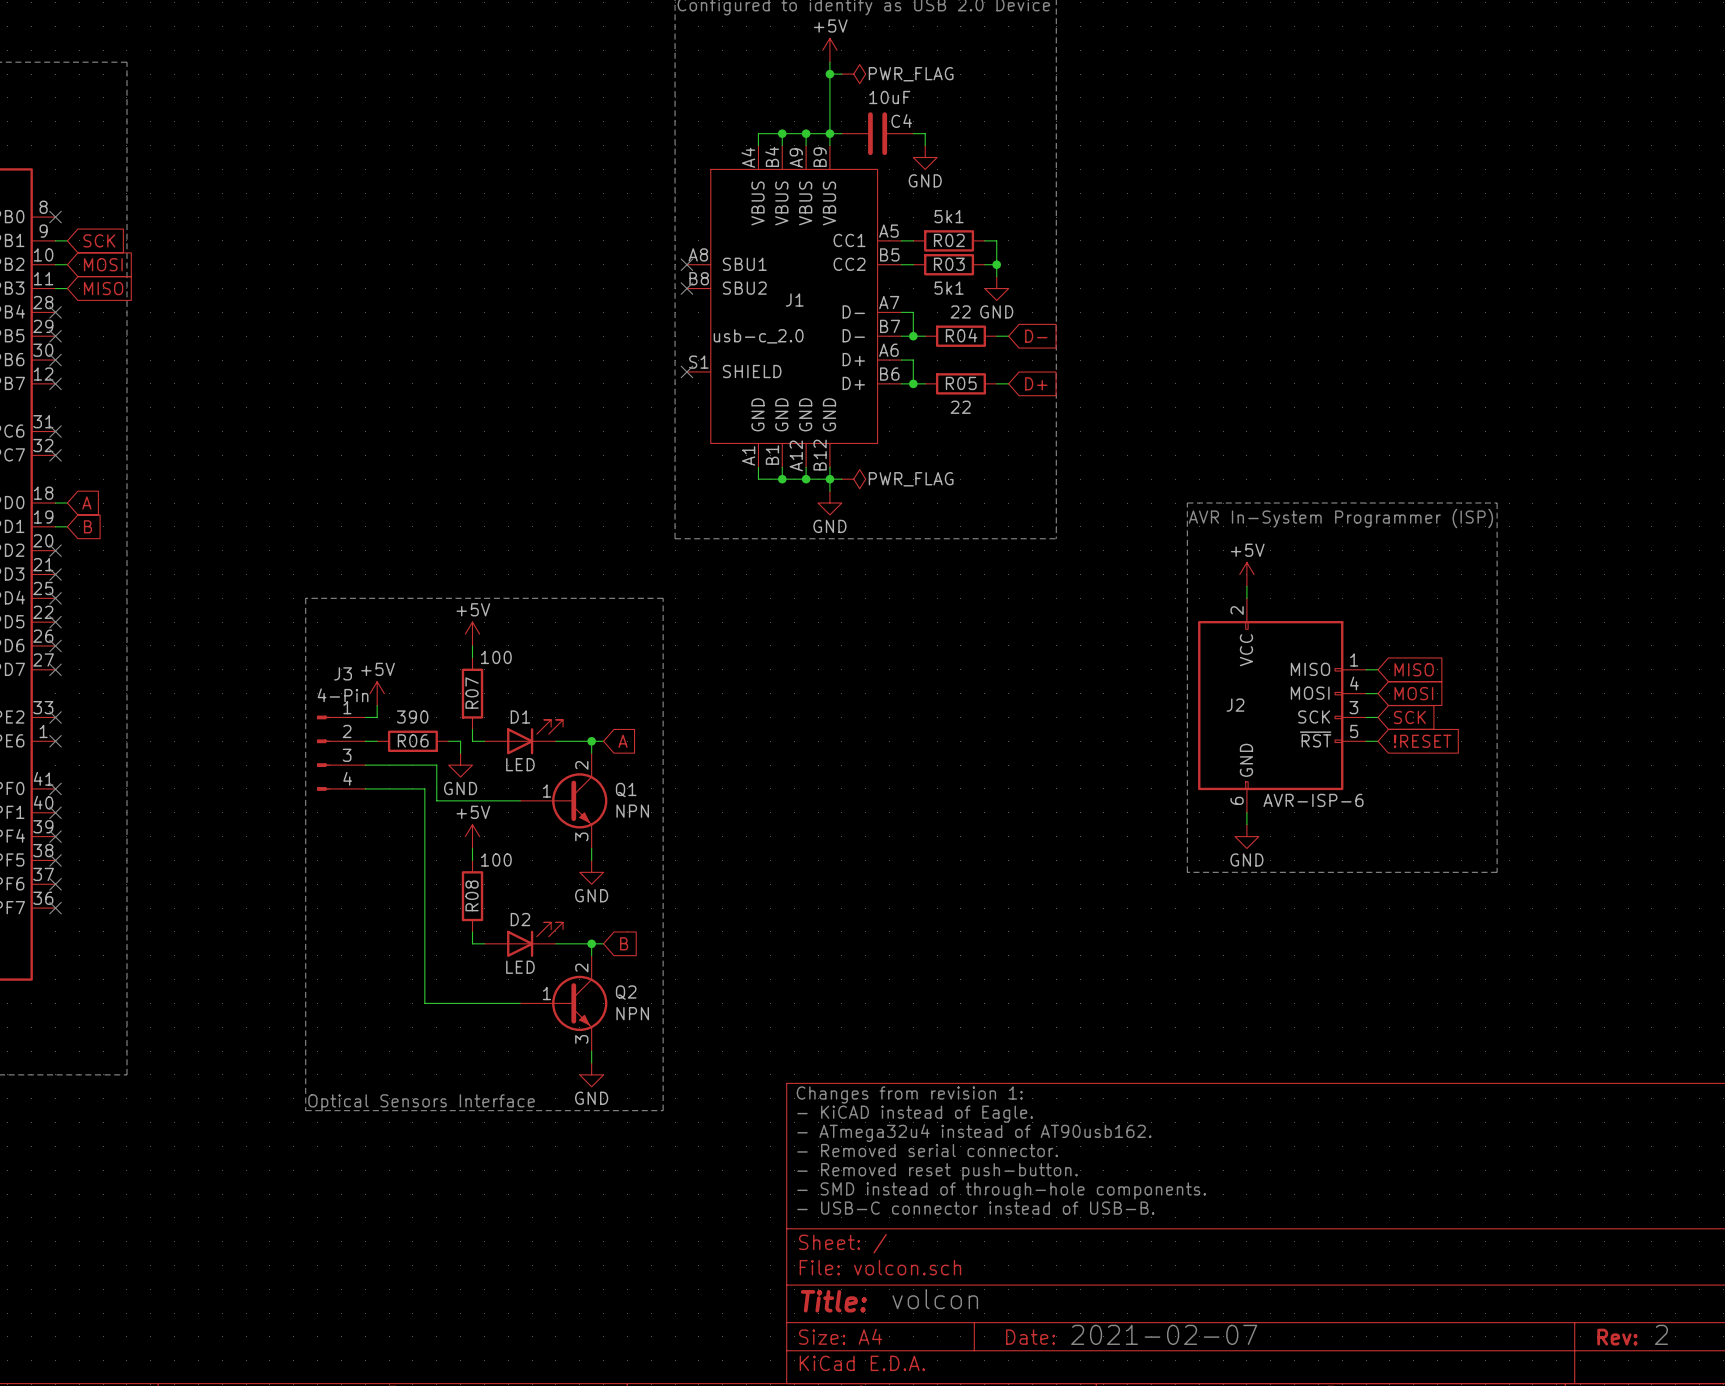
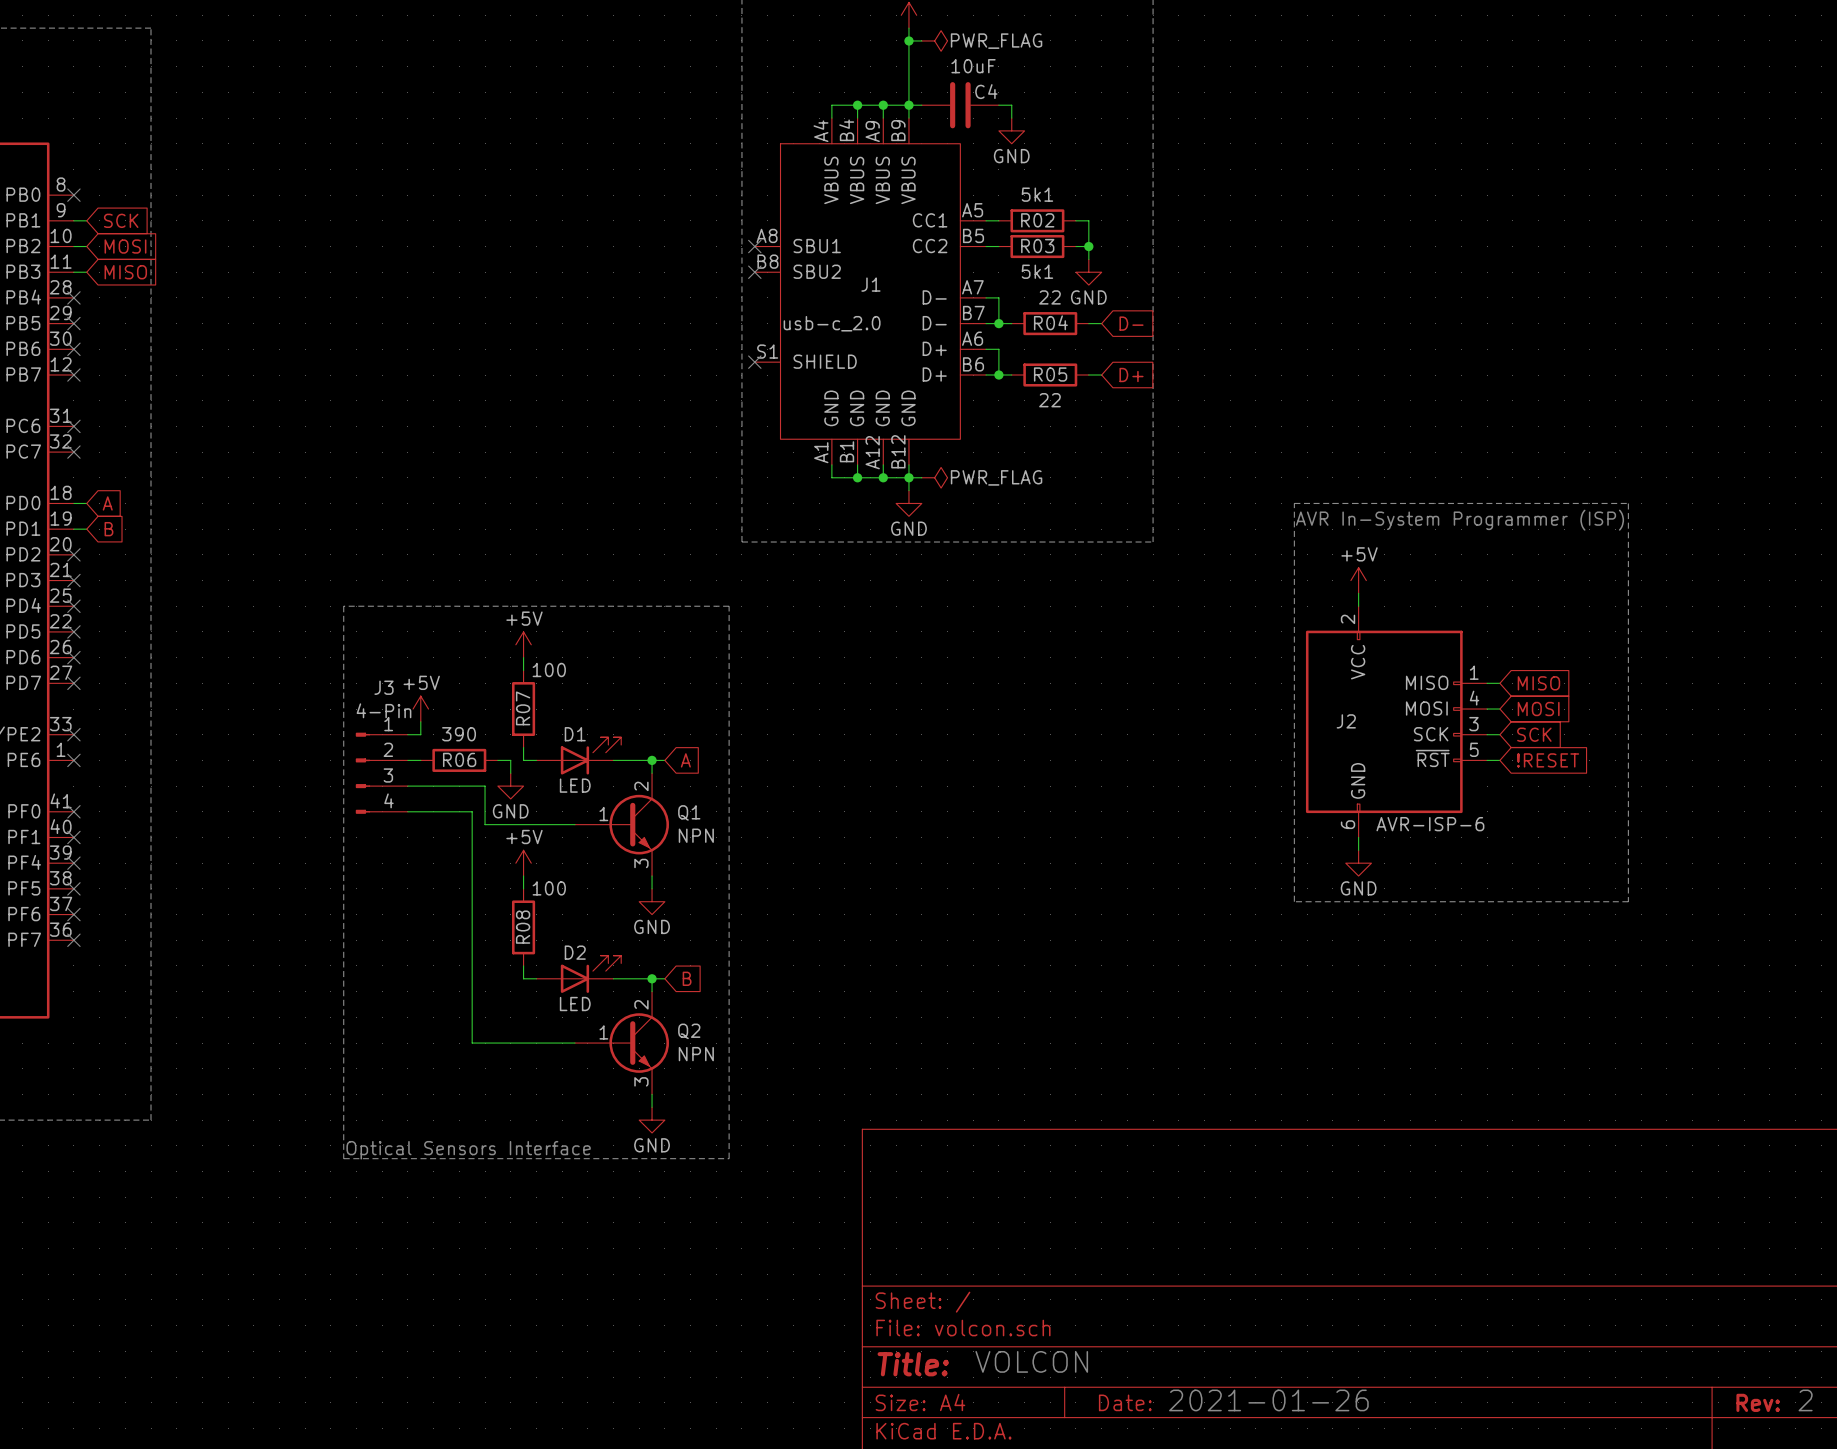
text: Changes from revision 1: (909, 1094) -> none
text: - KiCAD instead of Eagle. (915, 1114) -> none
text: - ATmega32u4 instead of AT90usb162. (974, 1133) -> none
text: - Removed serial connector. (927, 1150) -> none
text: - Removed reset push-button. (937, 1171) -> none
text: - SMD instead of through-hole components. (1001, 1190) -> none
text: - USB-C connector instead of USB-B. (975, 1208) -> none
text: volcon (935, 1299) -> VOLCON (1031, 1361)
text: 2021-02-07 (1164, 1334) -> 2021-01-26 (1268, 1400)

